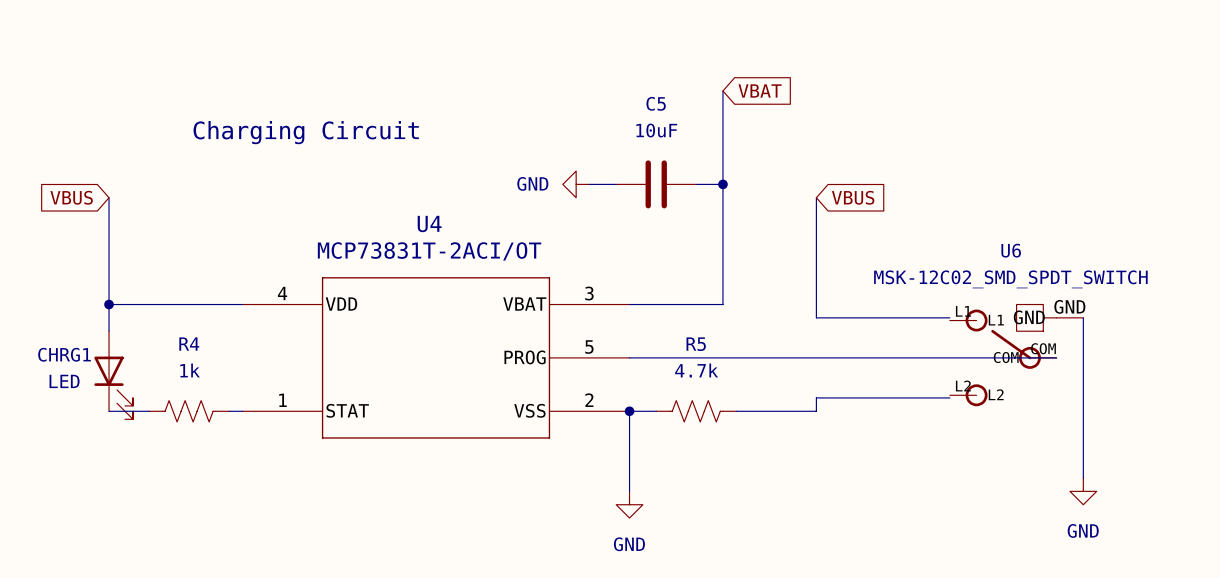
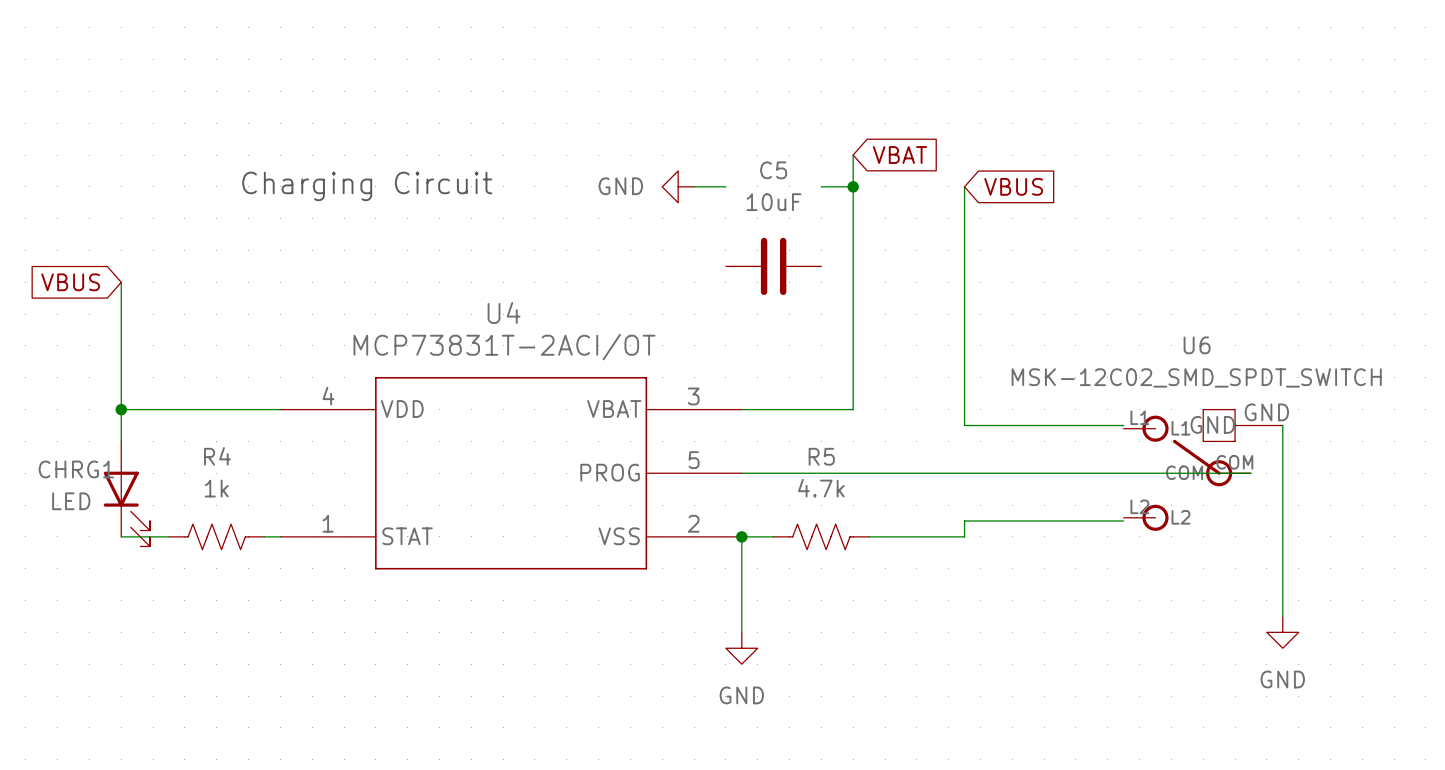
junction: none -> (853, 186)
wire: none -> (964, 186) (964, 282)
text position: Charging Circuit (306, 132) -> Charging Circuit (367, 186)
power symbol position: GND (576, 184) -> GND (678, 186)
wire: (589, 184) (616, 184) -> (694, 186) (725, 186)
wire: (696, 184) (722, 184) -> (821, 186) (853, 186)
junction: (722, 184) -> none
global label position: VBUS (853, 197) -> VBUS (1013, 186)

